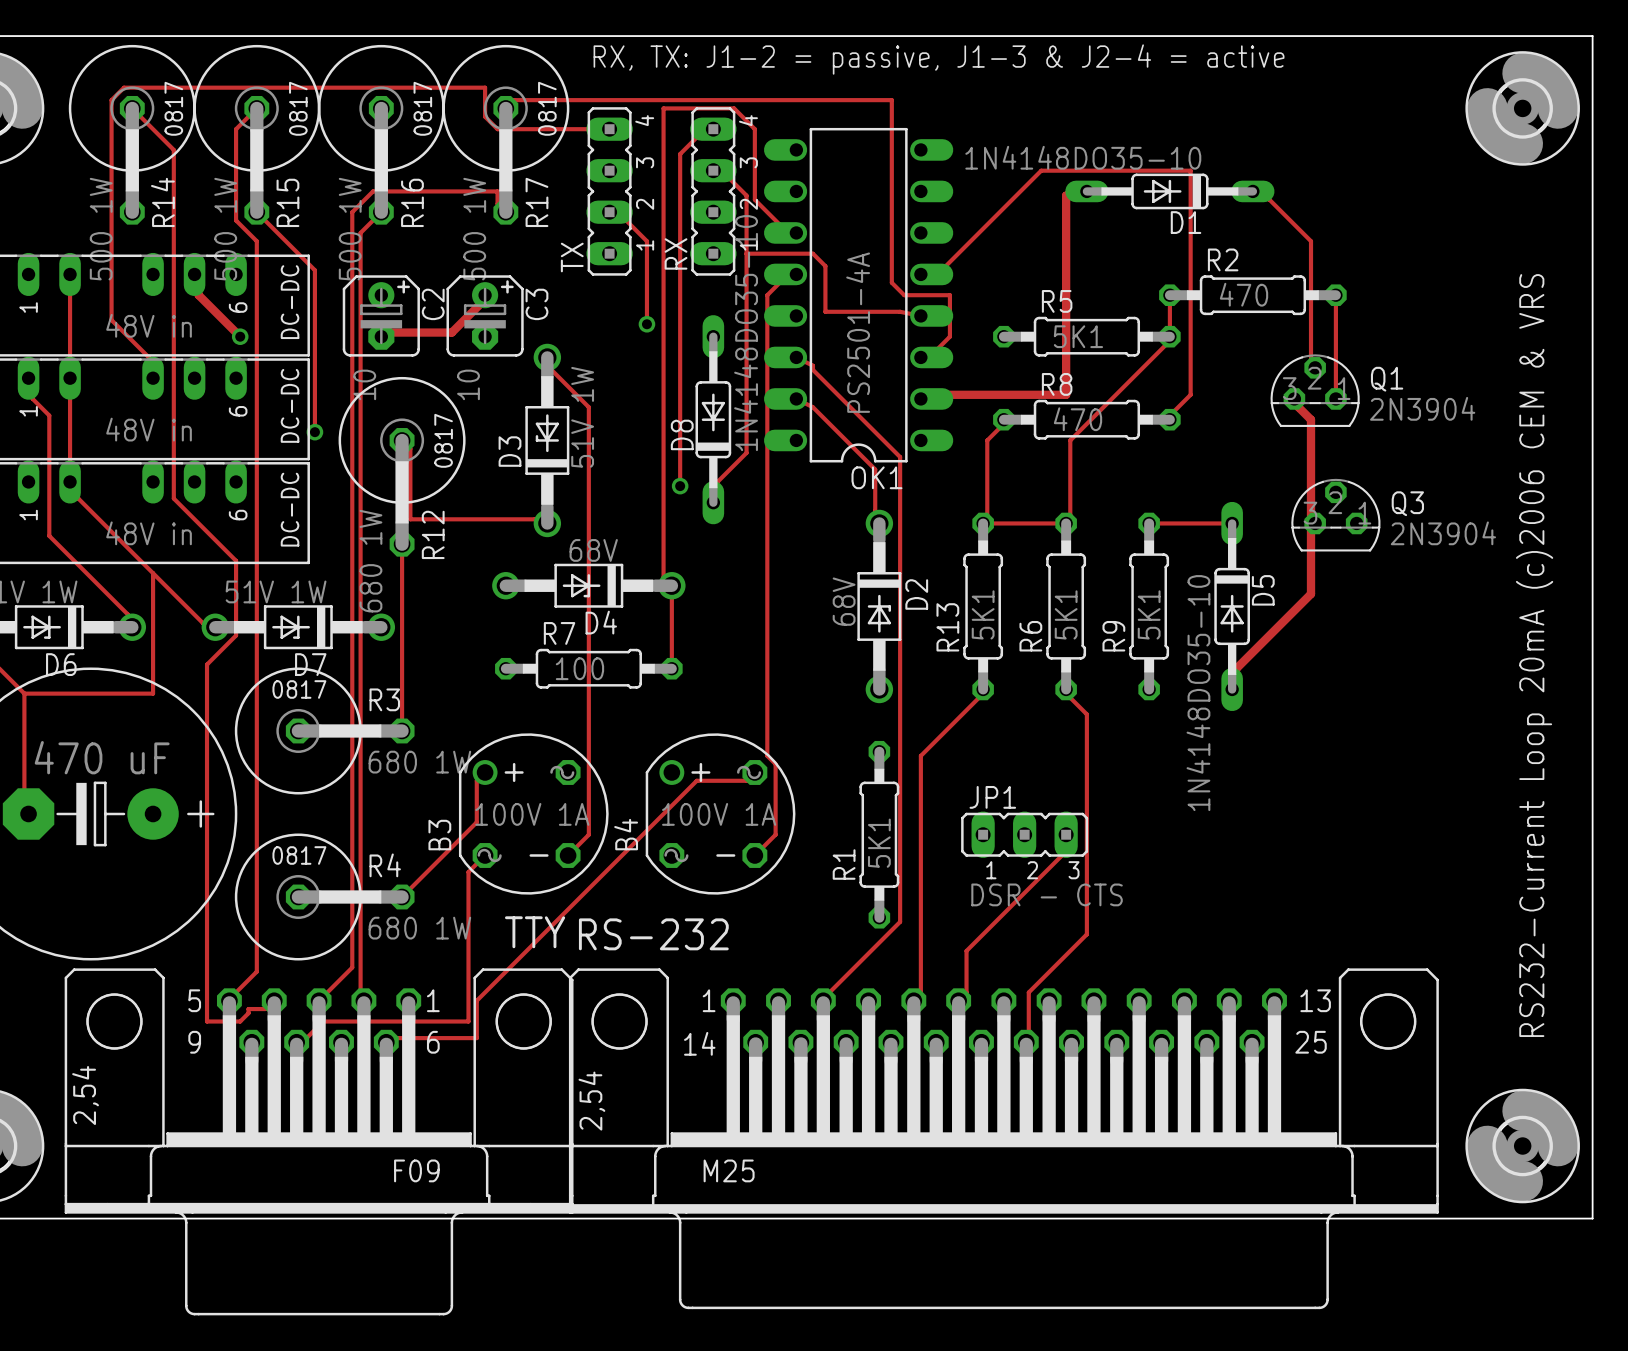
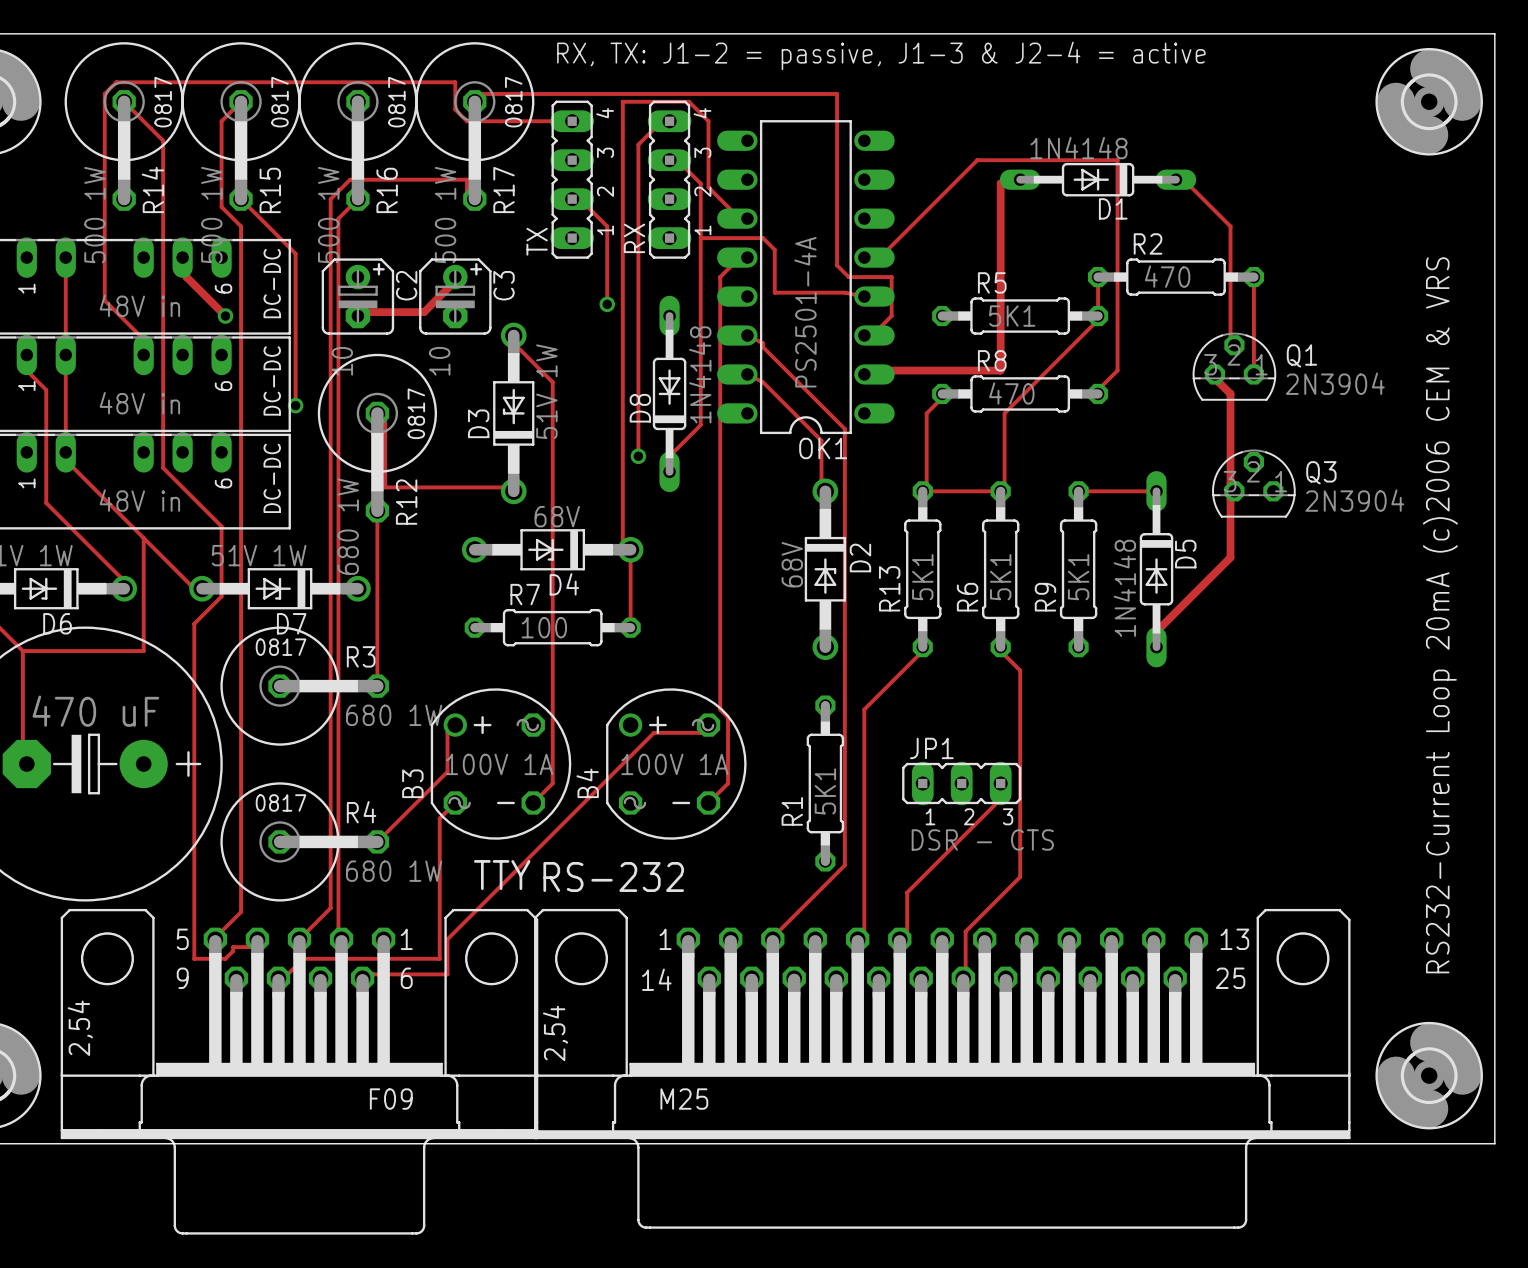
D1 value: 1N4148DO35-10 (1083, 157) -> 1N4148 (1078, 148)
D8 value: 1N4148DO35-10 (746, 333) -> 1N4148 (700, 374)
D5 value: 1N4148DO35-10 (1198, 693) -> 1N4148 (1124, 588)

